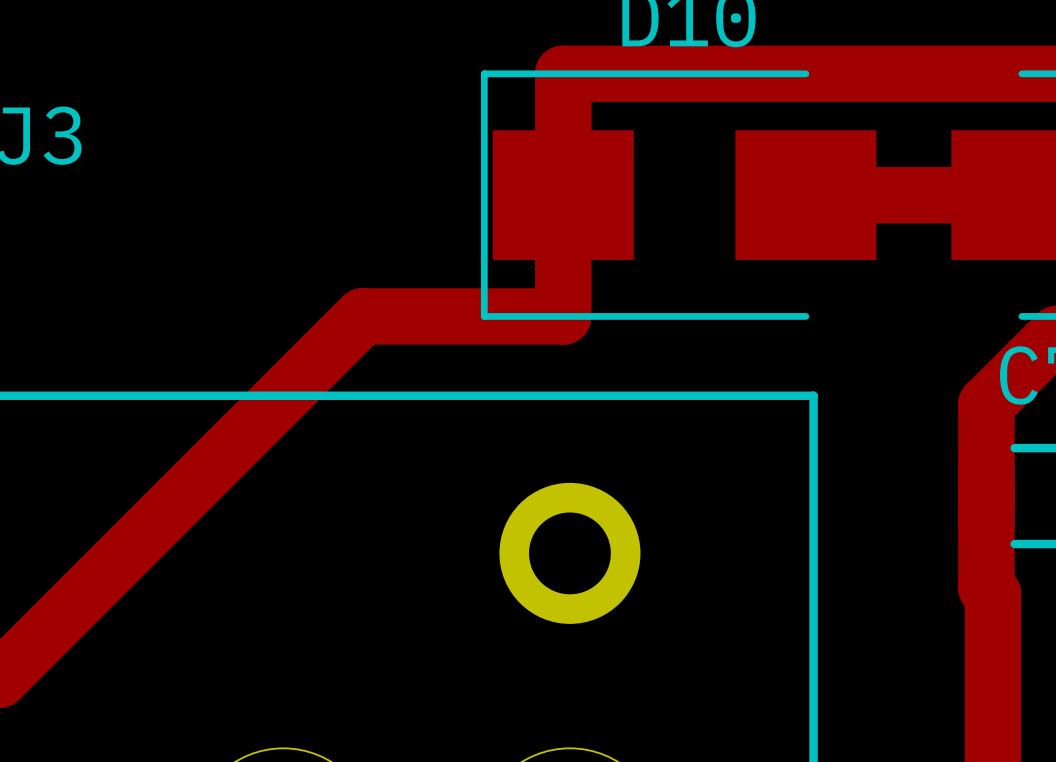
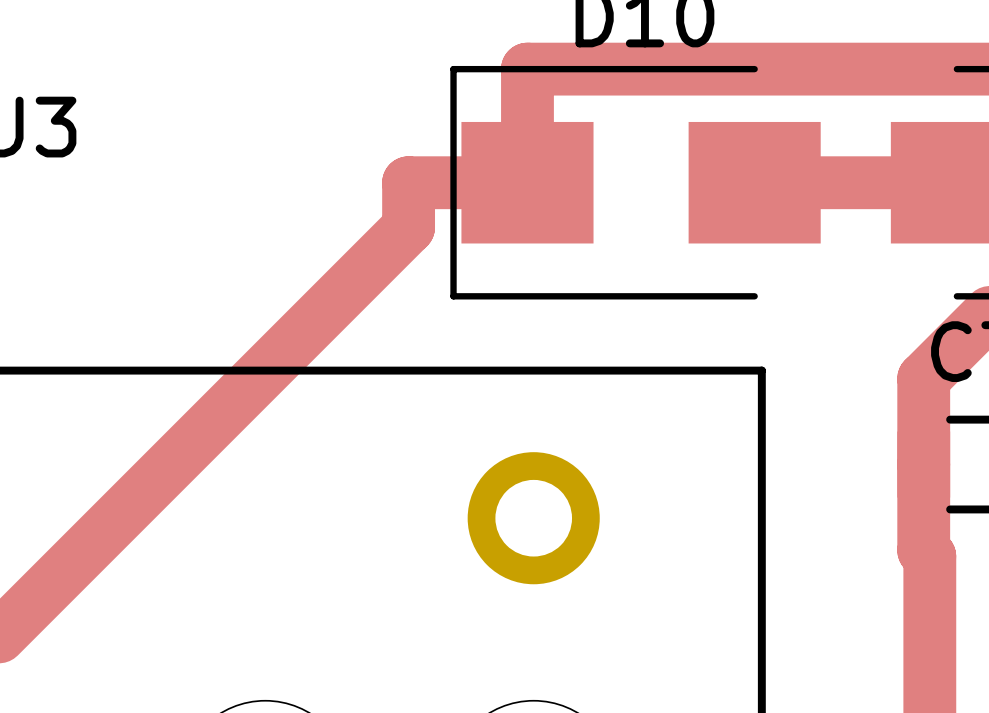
track: (563, 195) (563, 316) (362, 316) -> (527, 182) (408, 182) (408, 227) (339, 296)

